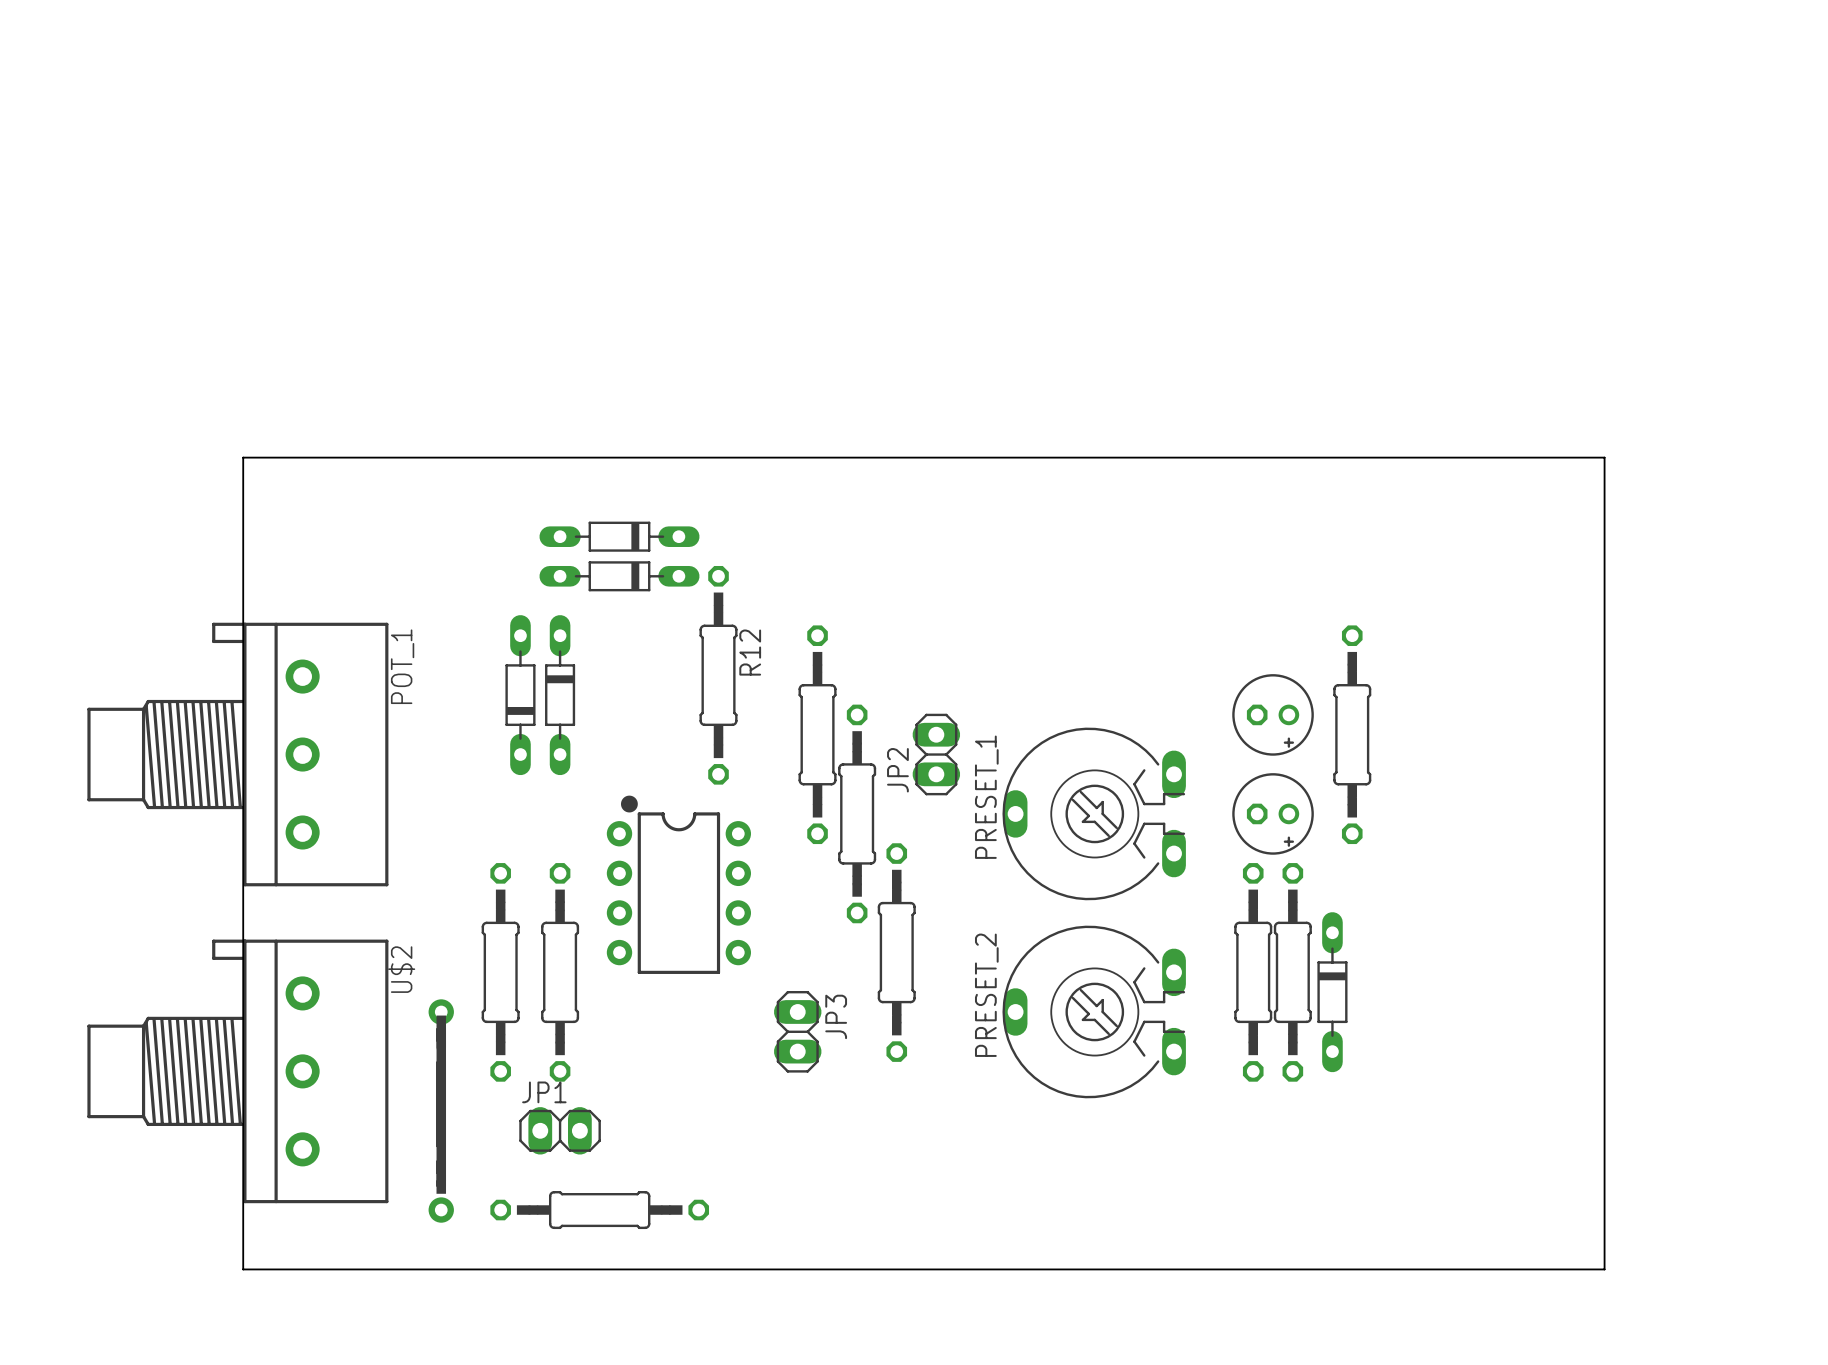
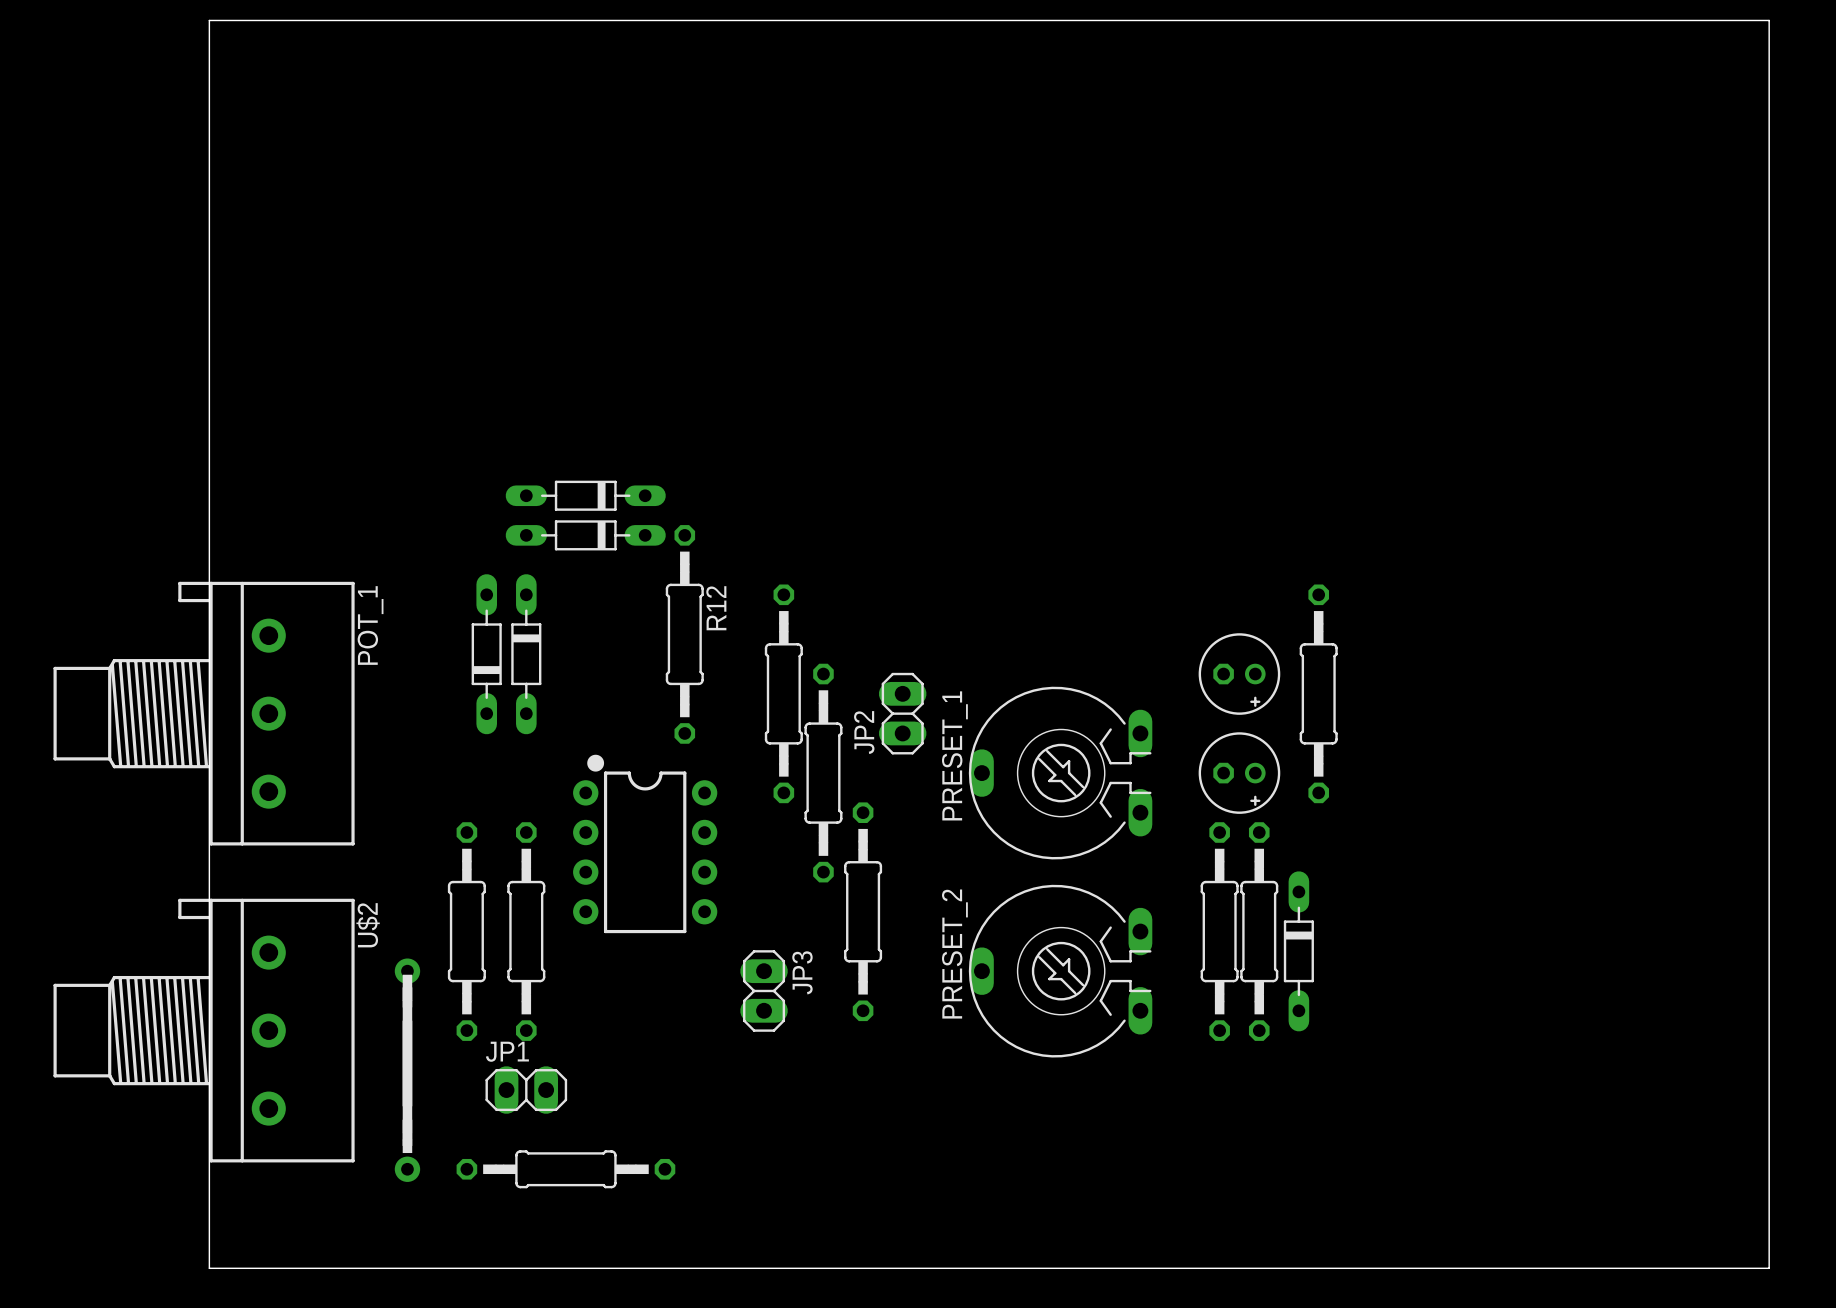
board edge: (243, 457) (1604, 457) (1604, 1269) (243, 1269) -> (209, 416) (209, 20) (1769, 20) (1769, 1268) (209, 1268) (209, 1228)

